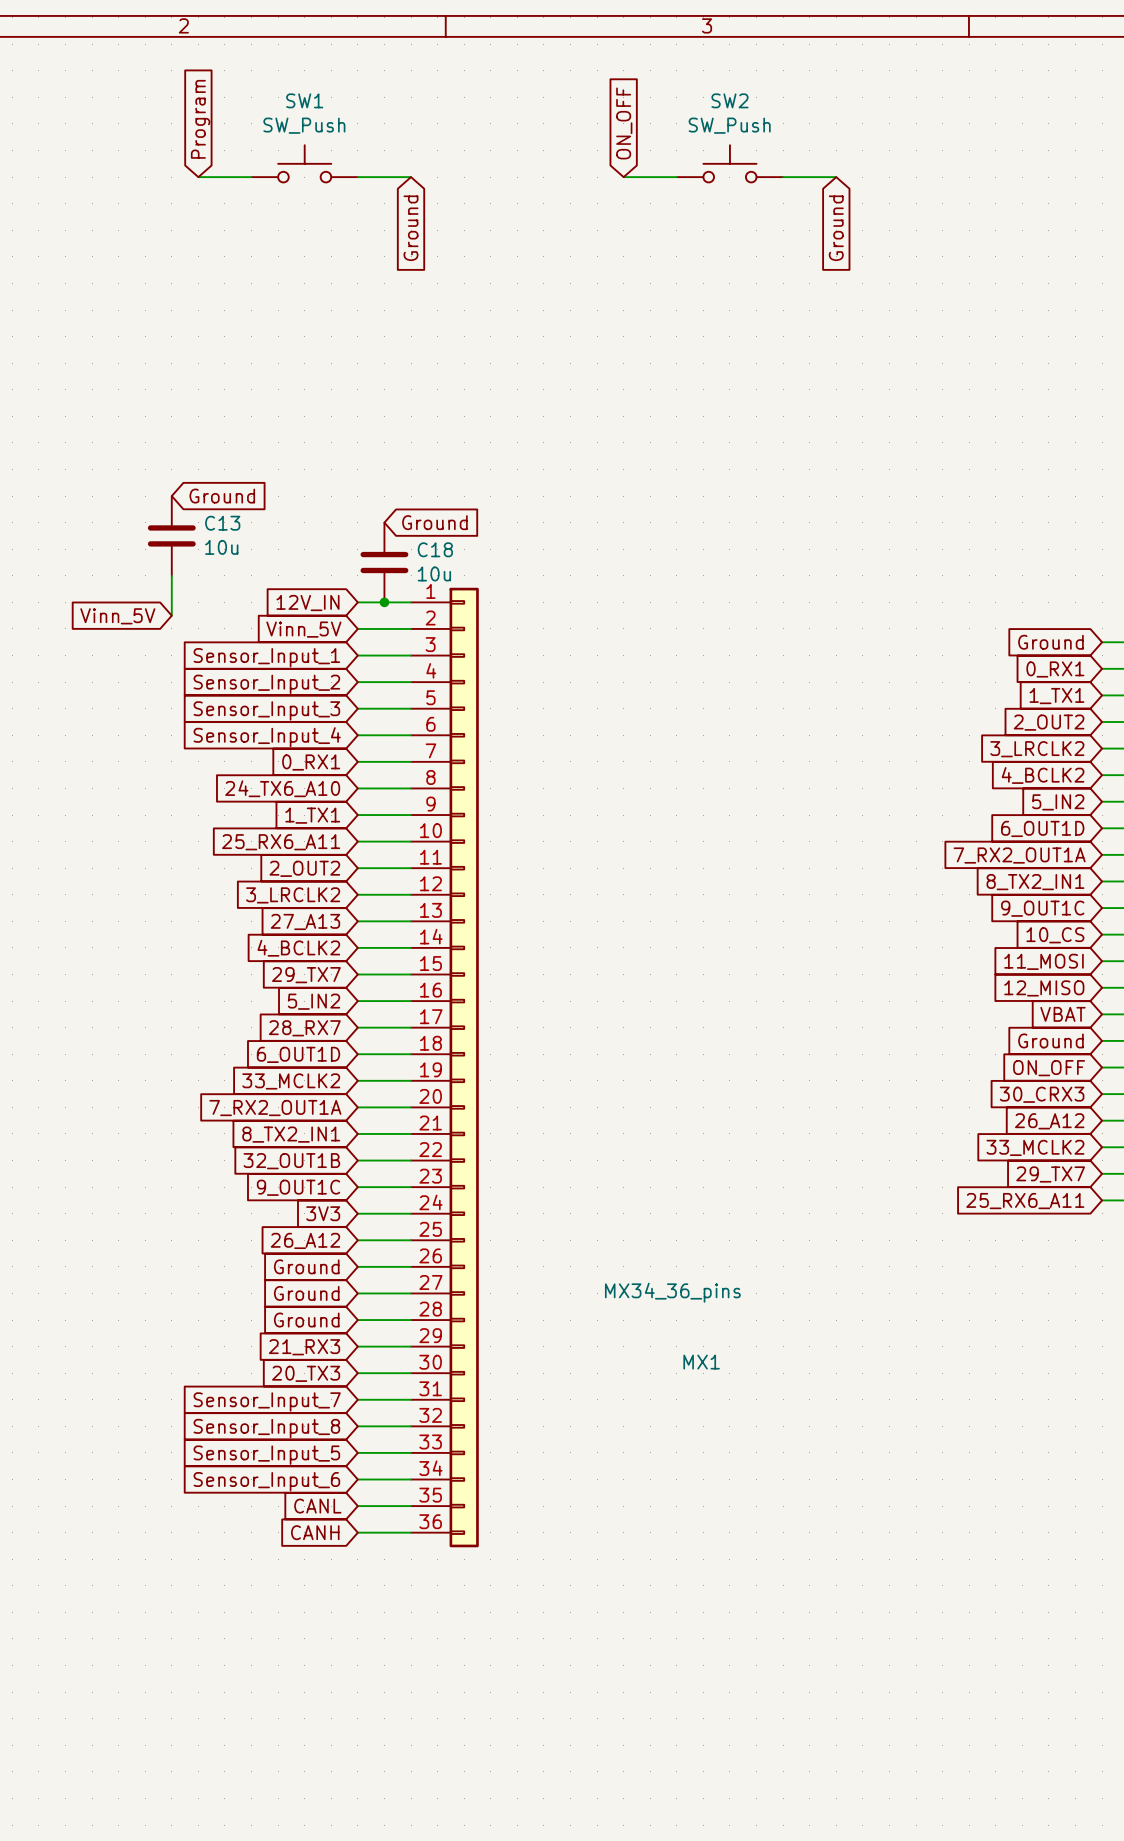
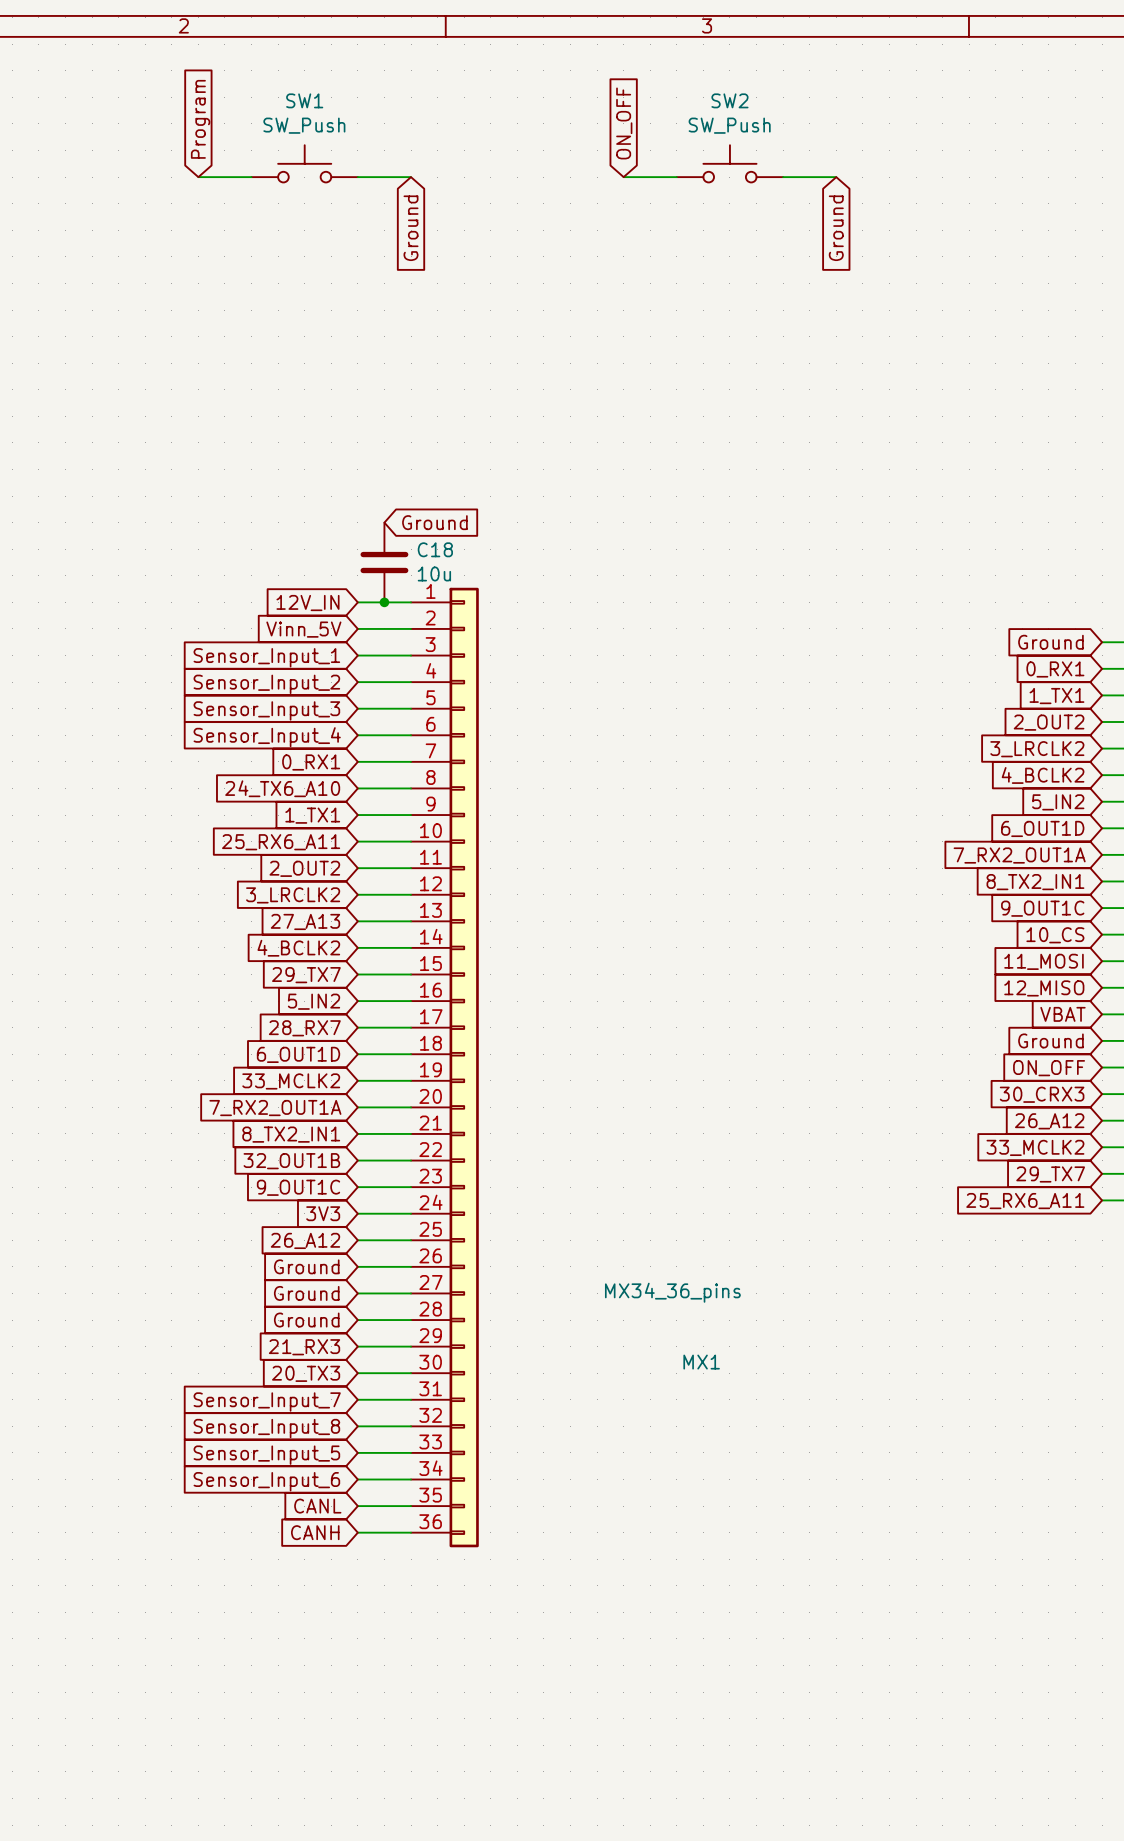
global label: Ground (222, 496) -> none
C13: 10u (171, 535) -> none
wire: (171, 575) (171, 615) -> none
global label: Vinn_5V (117, 616) -> none

